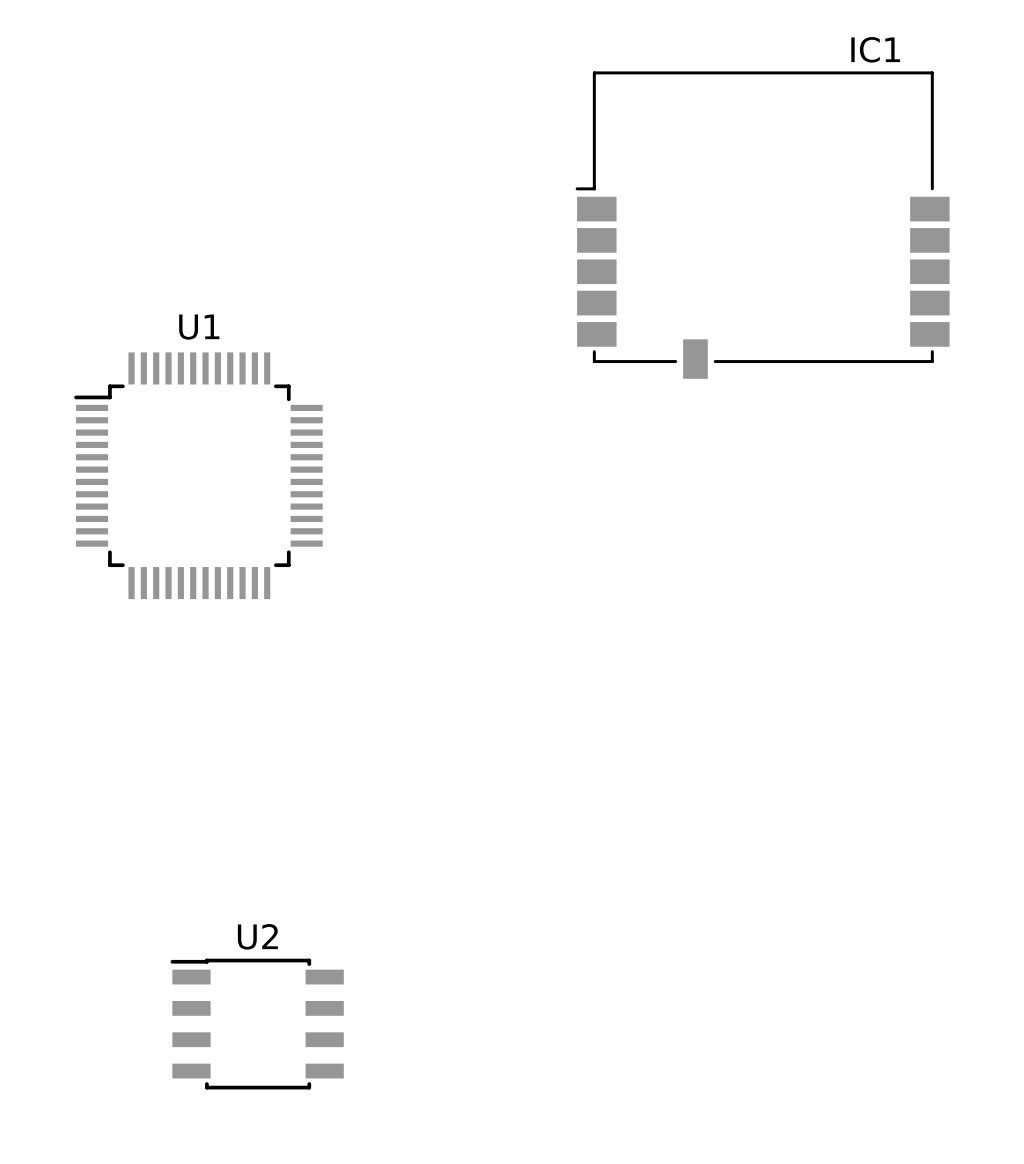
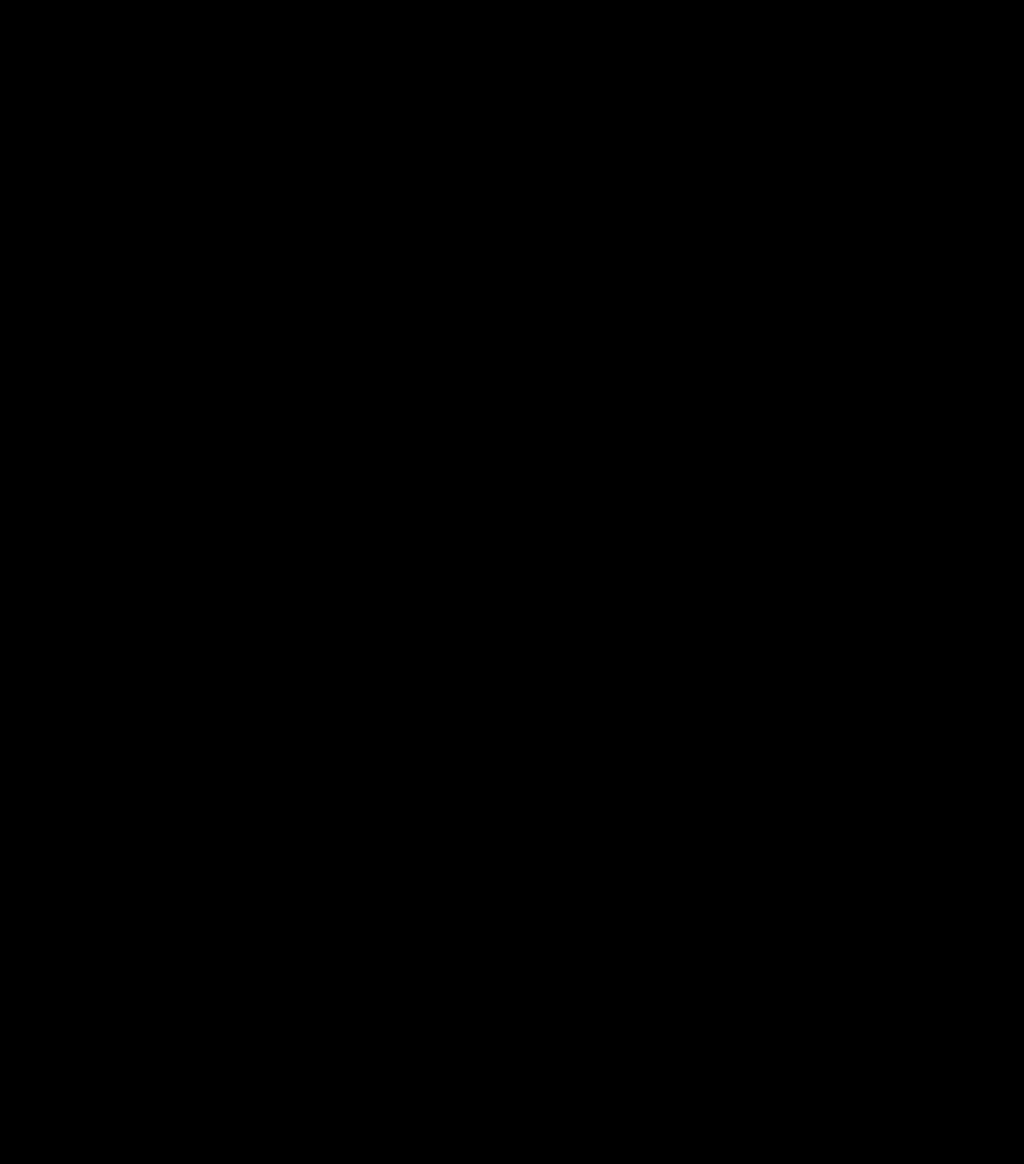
IC1: (762, 225) -> none
U1: (198, 475) -> none
U2: (257, 1024) -> none

